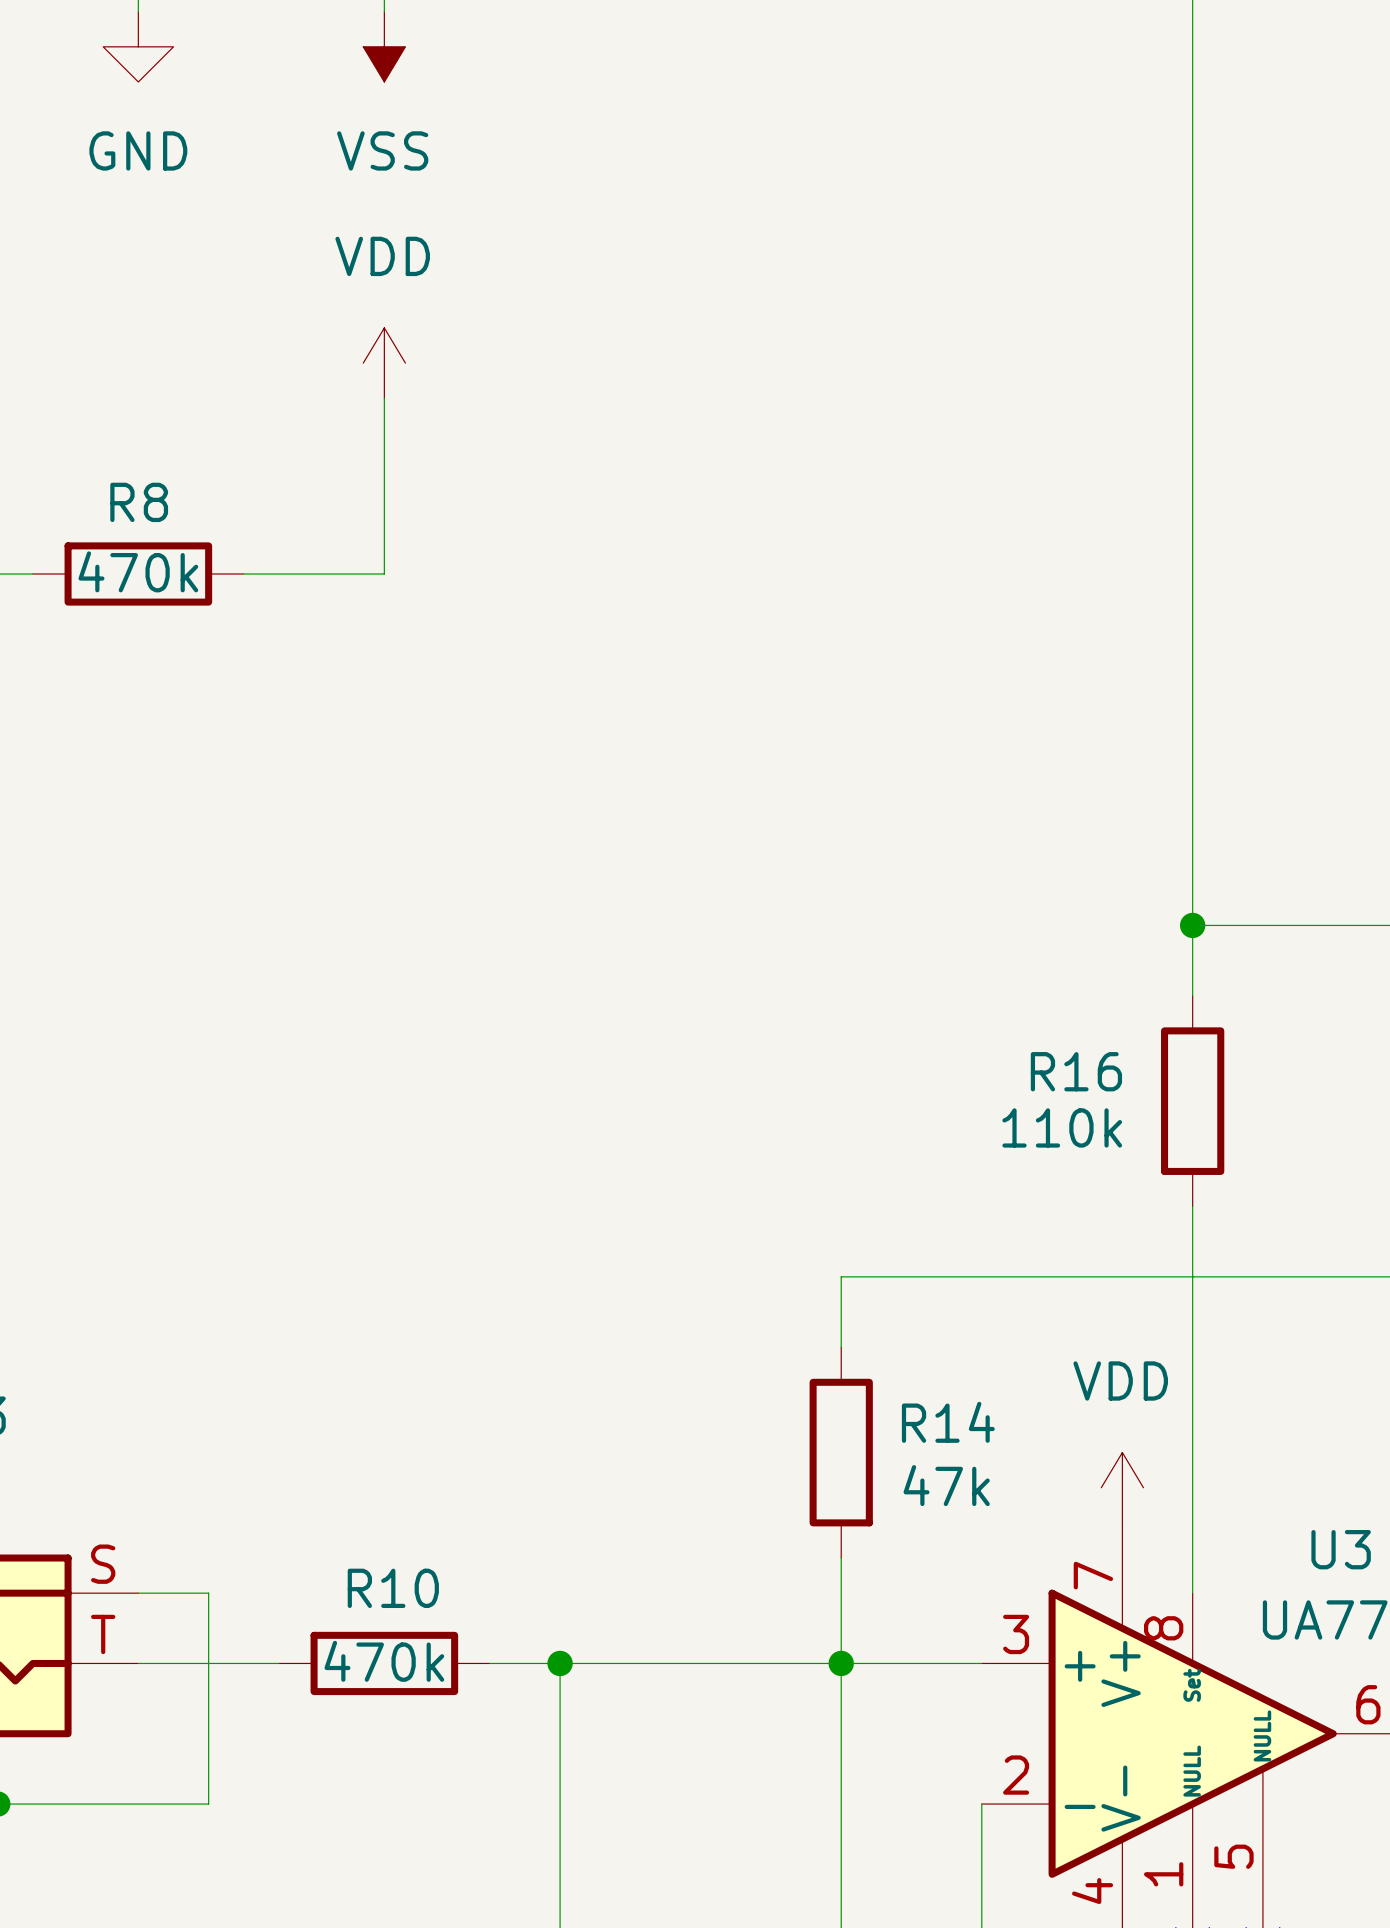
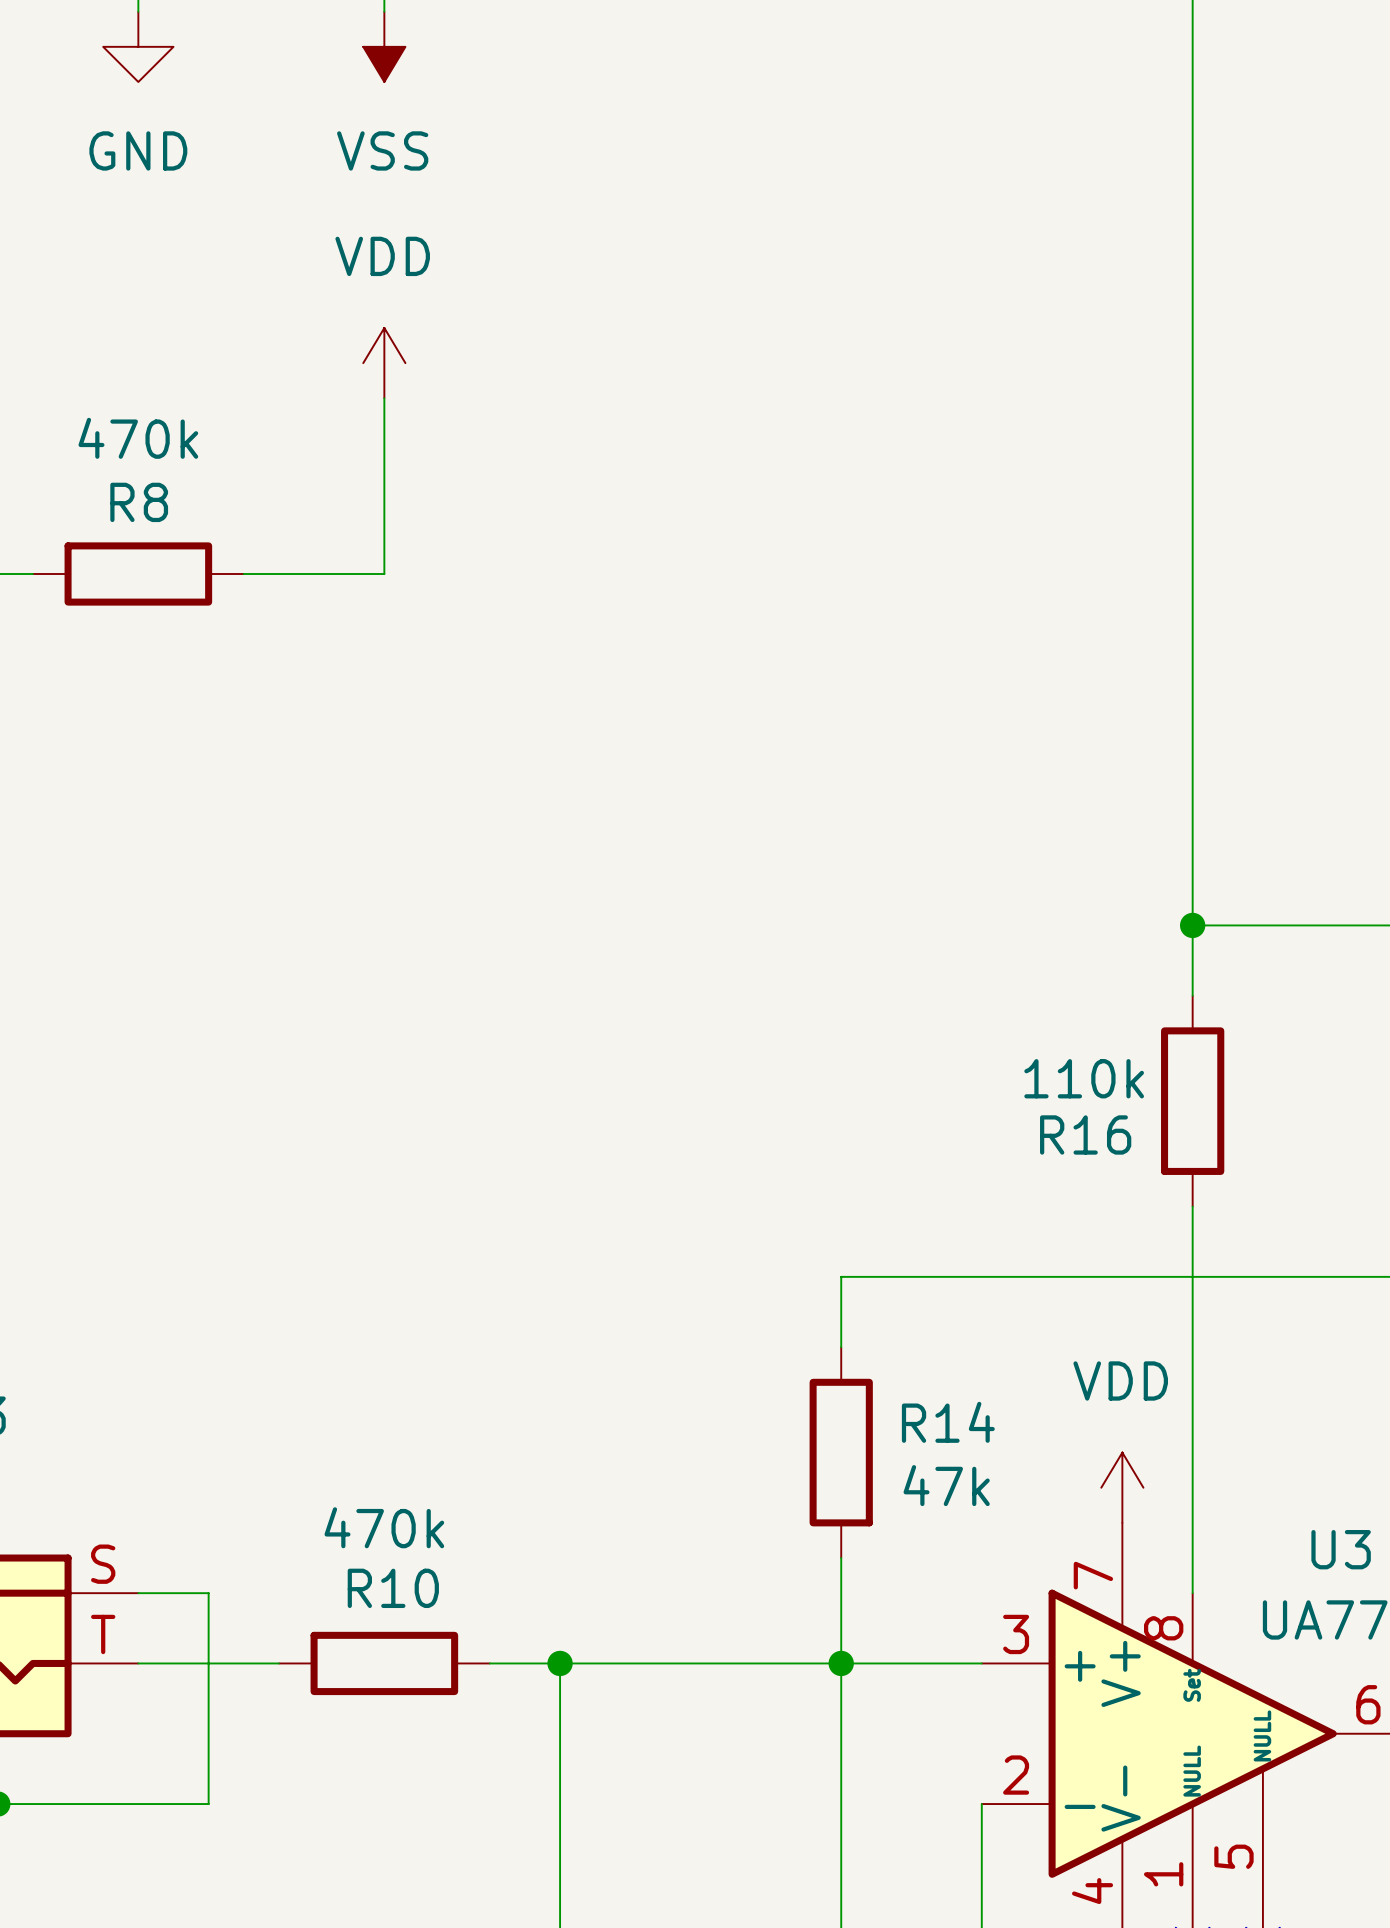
R8 value position: 470k (138, 571) -> 470k (138, 438)
R16 name position: R16 (1076, 1071) -> R16 (1085, 1134)
R16 value position: 110k (1062, 1127) -> 110k (1084, 1078)
R10 value position: 470k (384, 1661) -> 470k (384, 1527)

